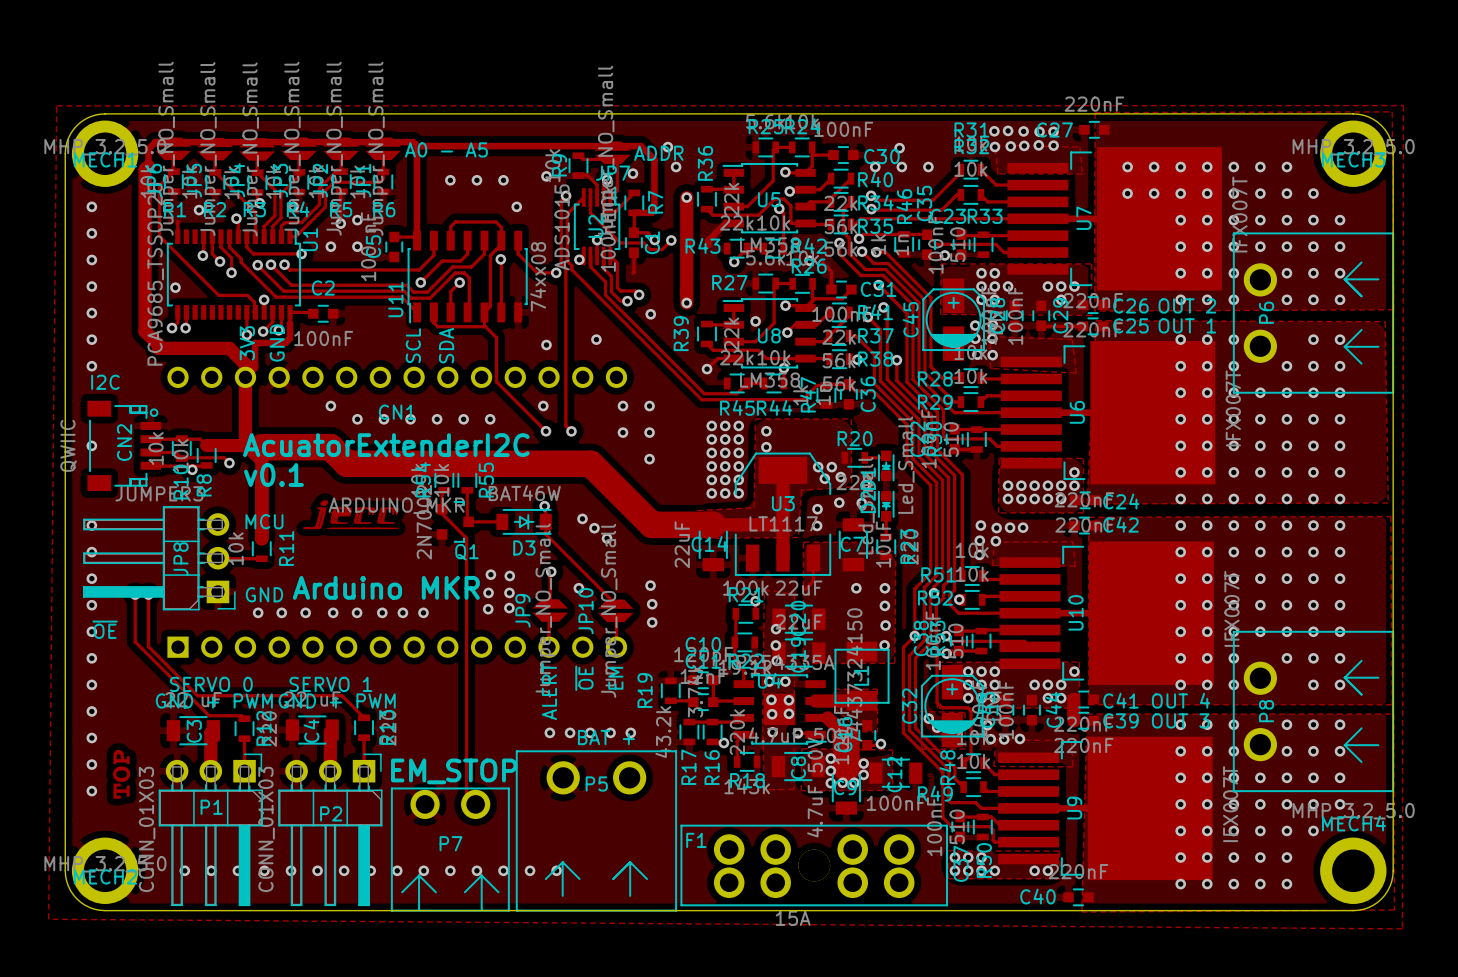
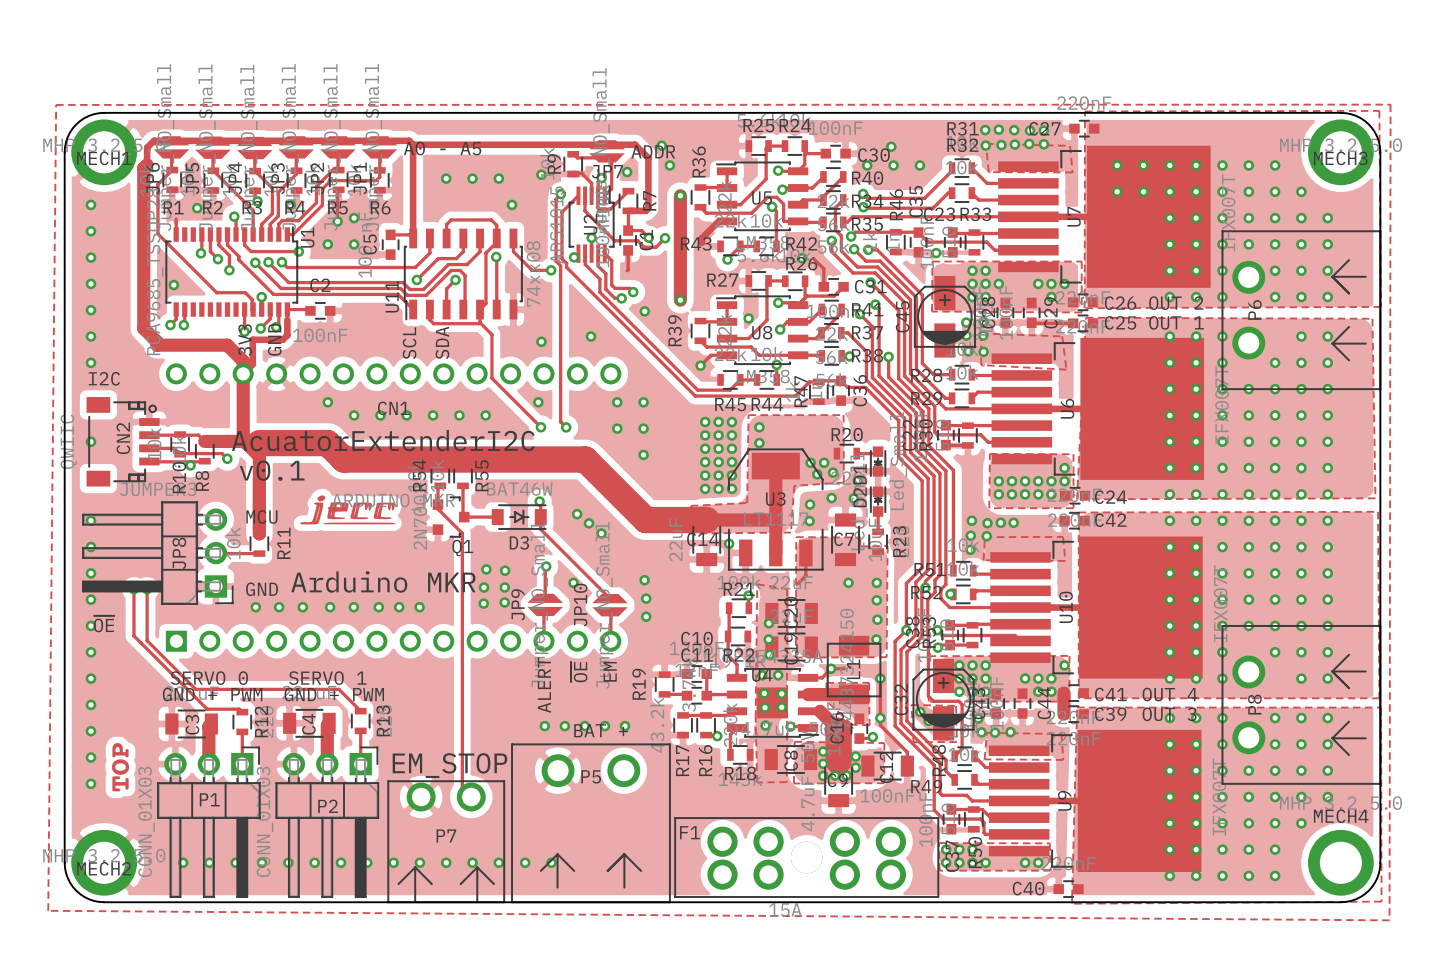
via: none -> (729, 543)
via: none -> (831, 668)
track: none -> (844, 668) (831, 668) (821, 677) (808, 677)
track: none -> (880, 678) (880, 725) (907, 752) (907, 766)
via: none -> (880, 678)
via: none -> (880, 718)

